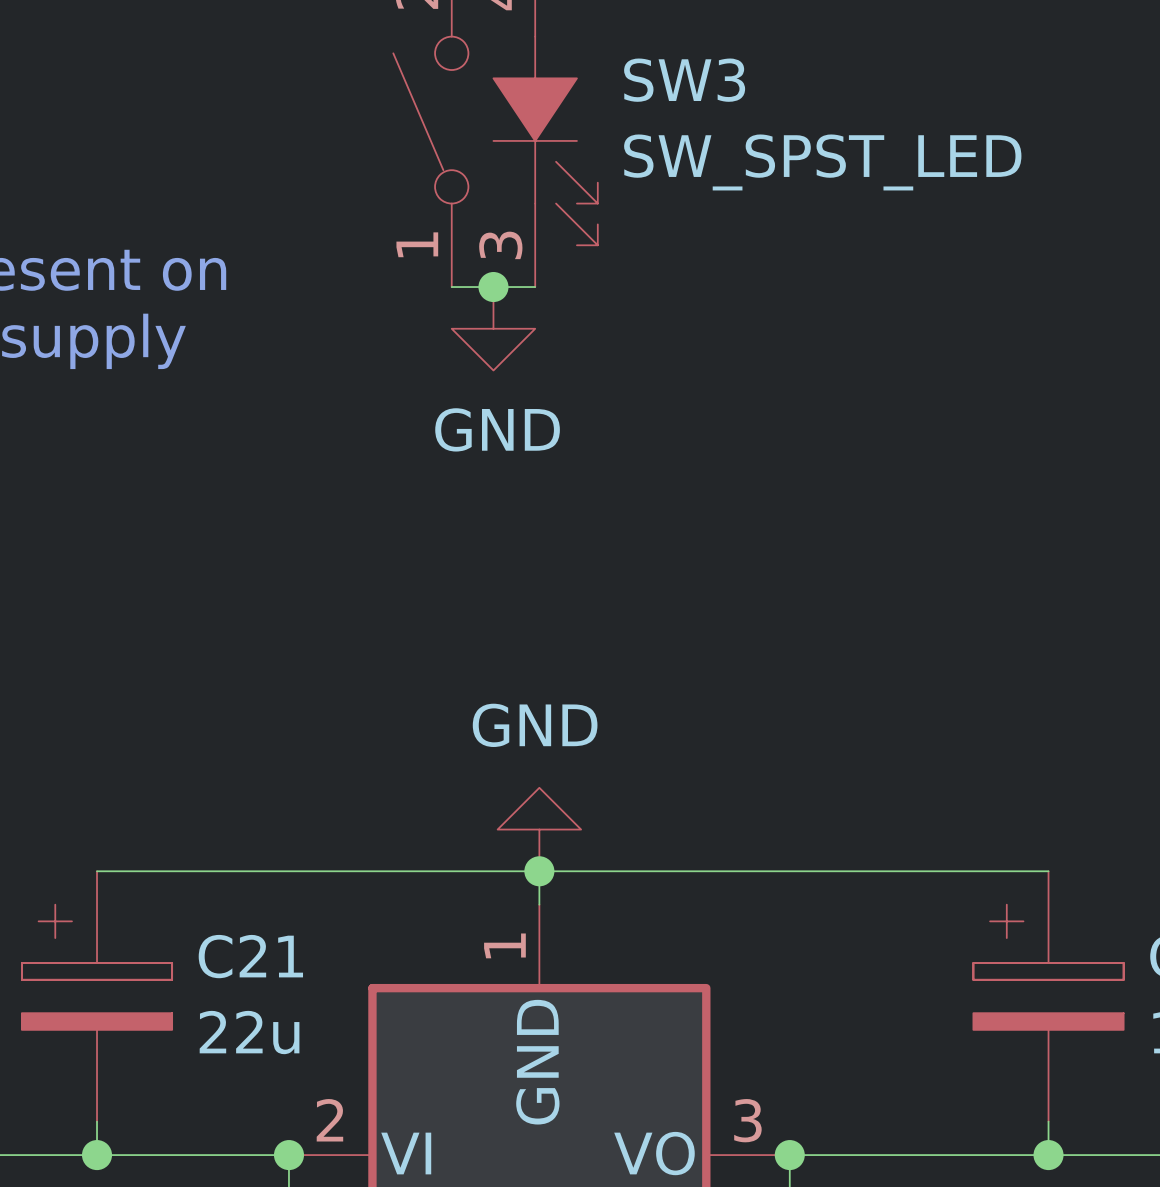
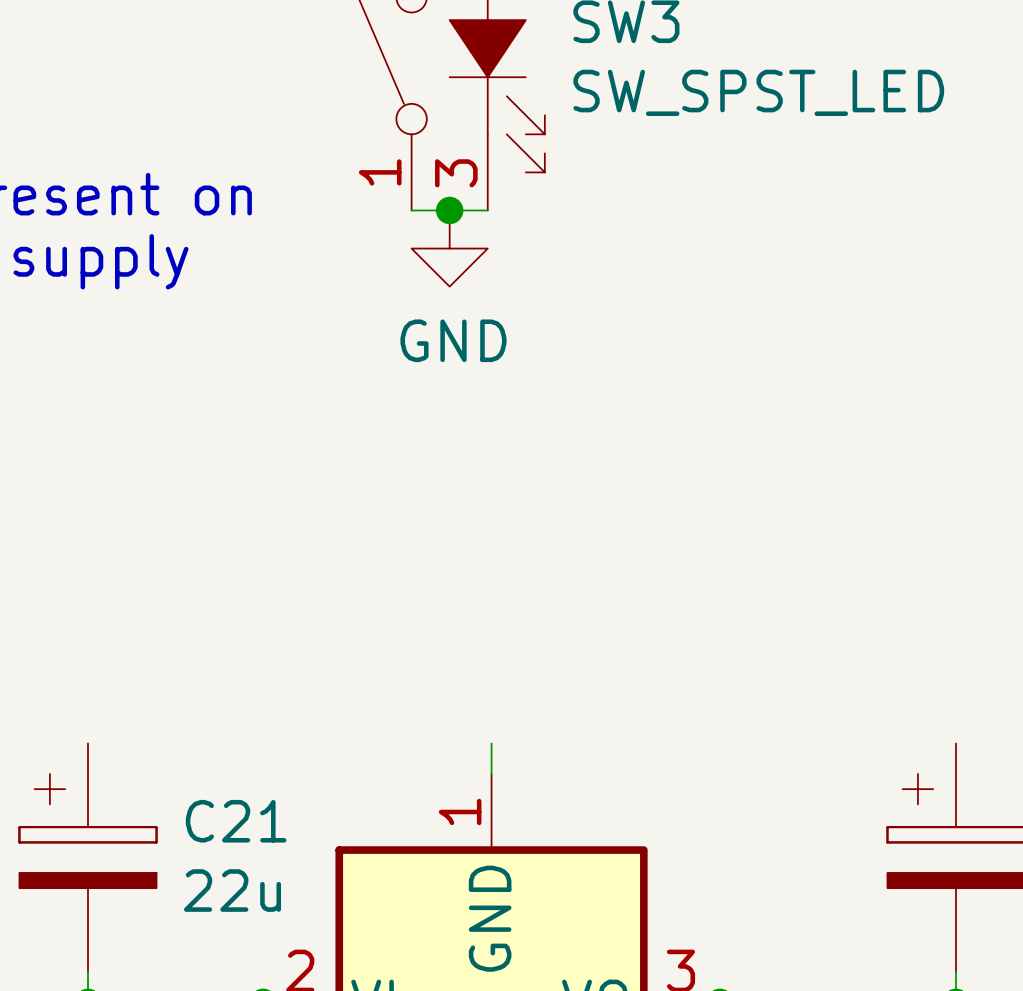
power symbol: GND (539, 829) -> none
wire: (97, 871) (1048, 871) -> none
junction: (539, 871) -> none

